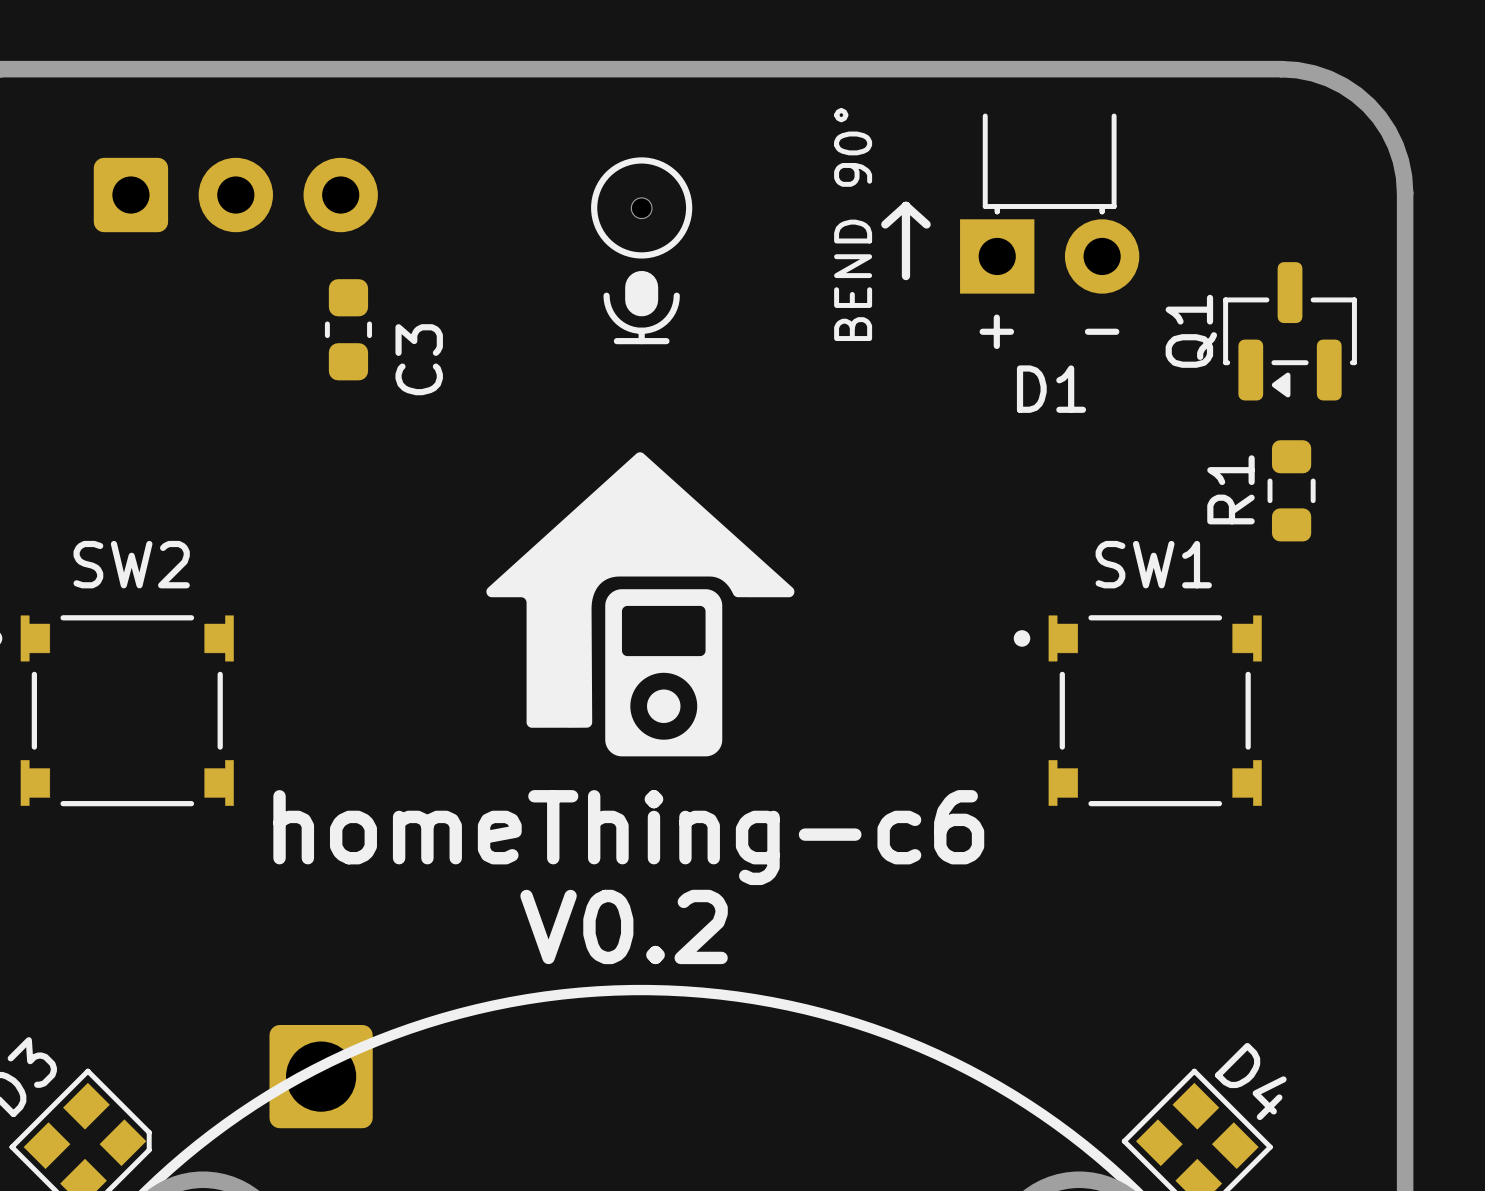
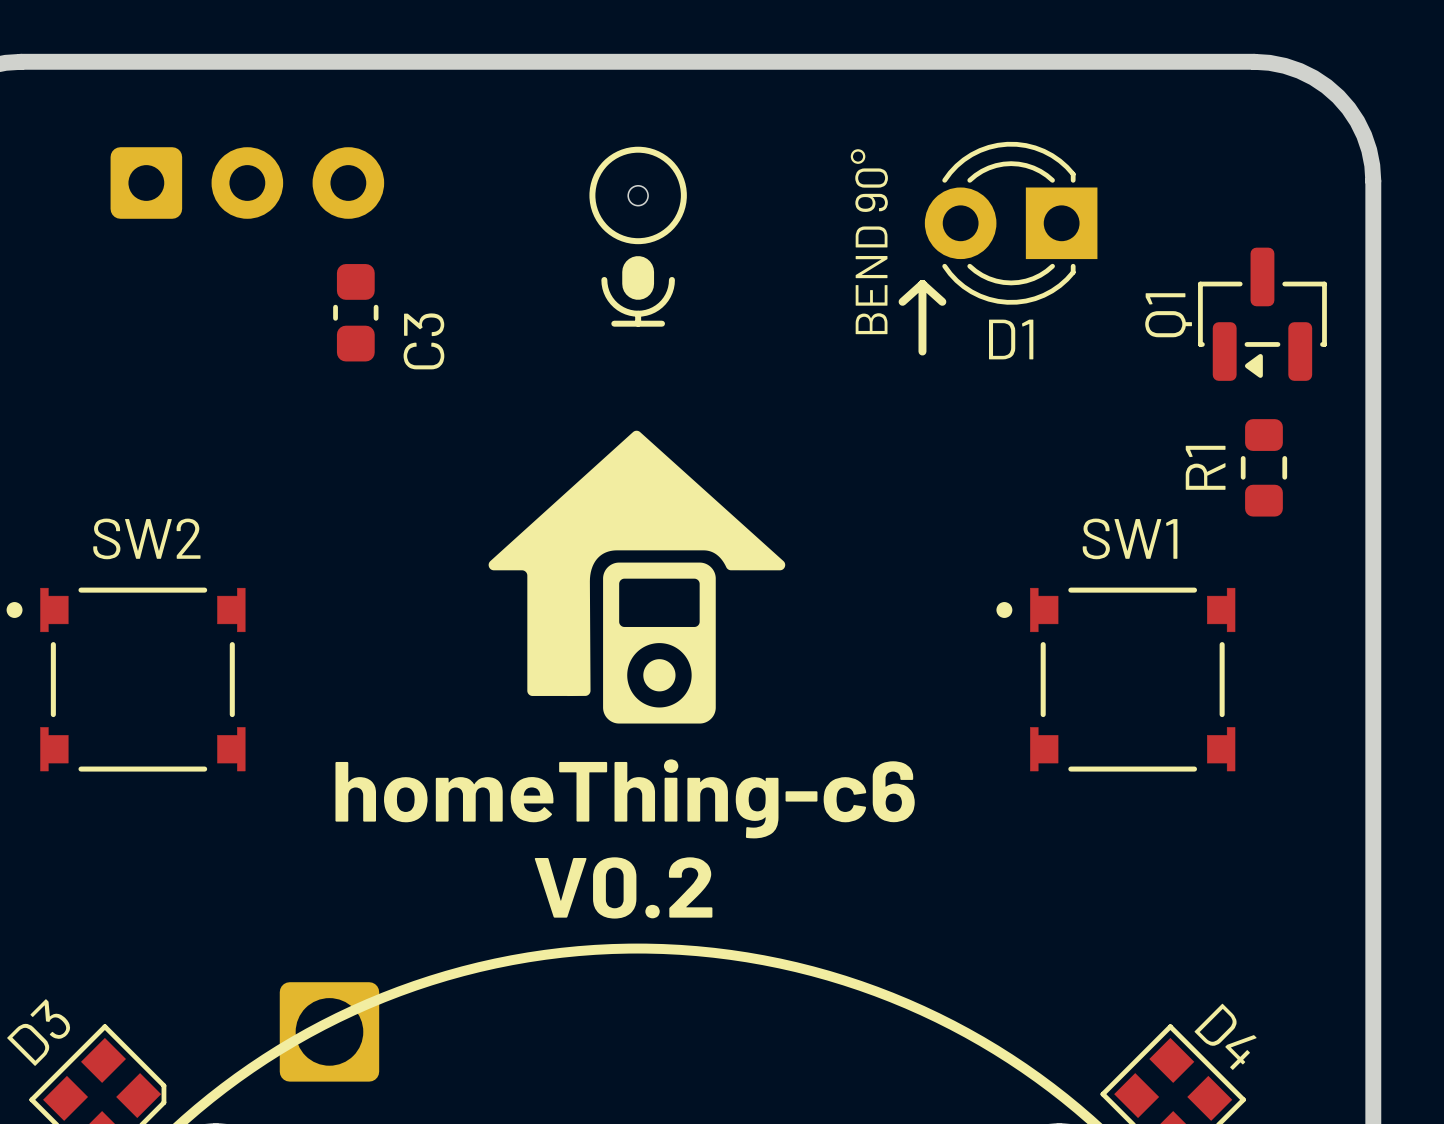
D1 footprint: [960, 113, 1140, 294] -> [924, 141, 1098, 305]
line: (905, 205) (885, 224) -> (922, 283) (902, 301)
line: (905, 205) (926, 224) -> (922, 283) (942, 301)
line: (905, 205) (905, 276) -> (922, 283) (922, 351)
text position: BEND 90° (853, 224) -> BEND 90° (869, 241)

